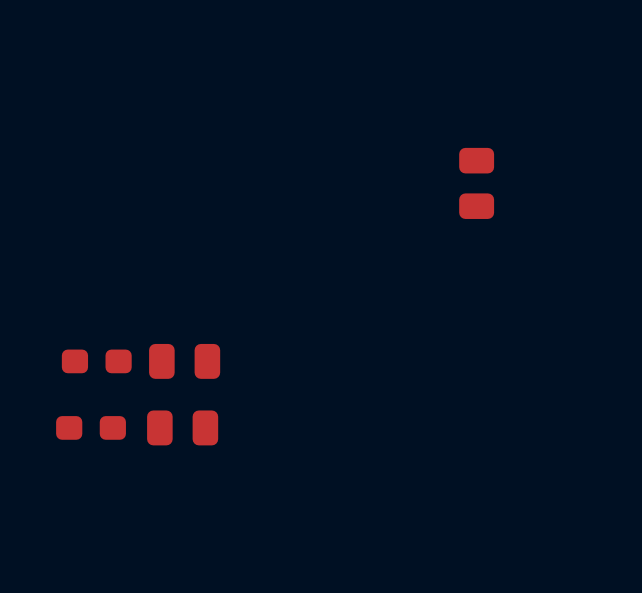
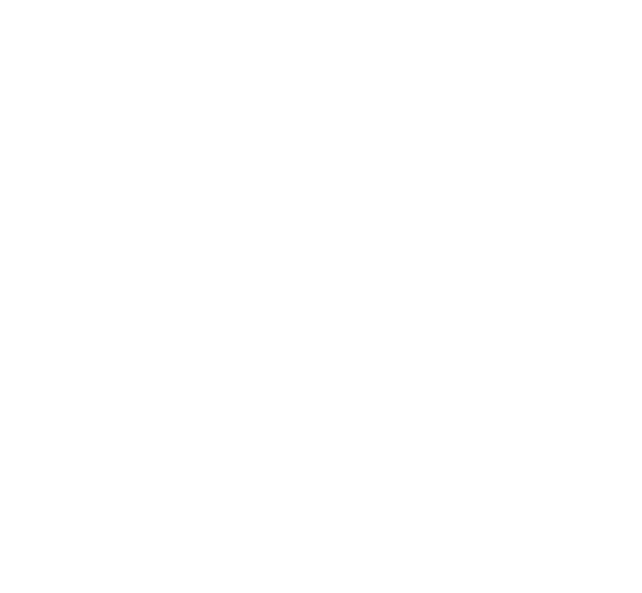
part: (476, 183) -> none
part: (96, 361) -> none
part: (184, 361) -> none
part: (91, 427) -> none
part: (182, 427) -> none

